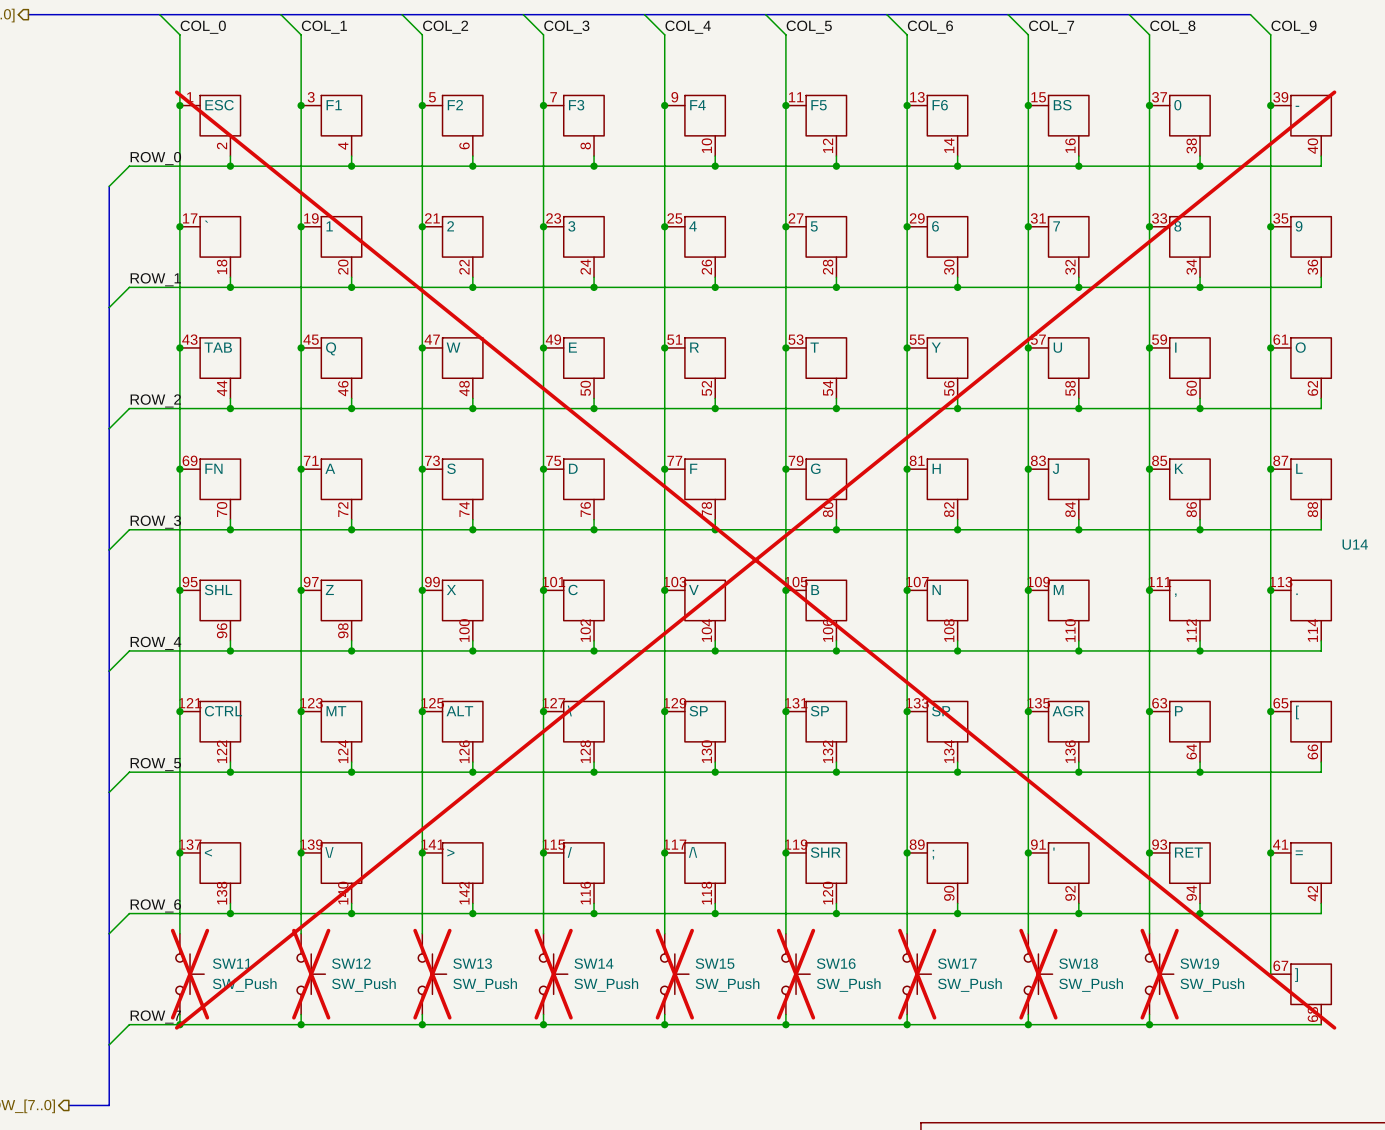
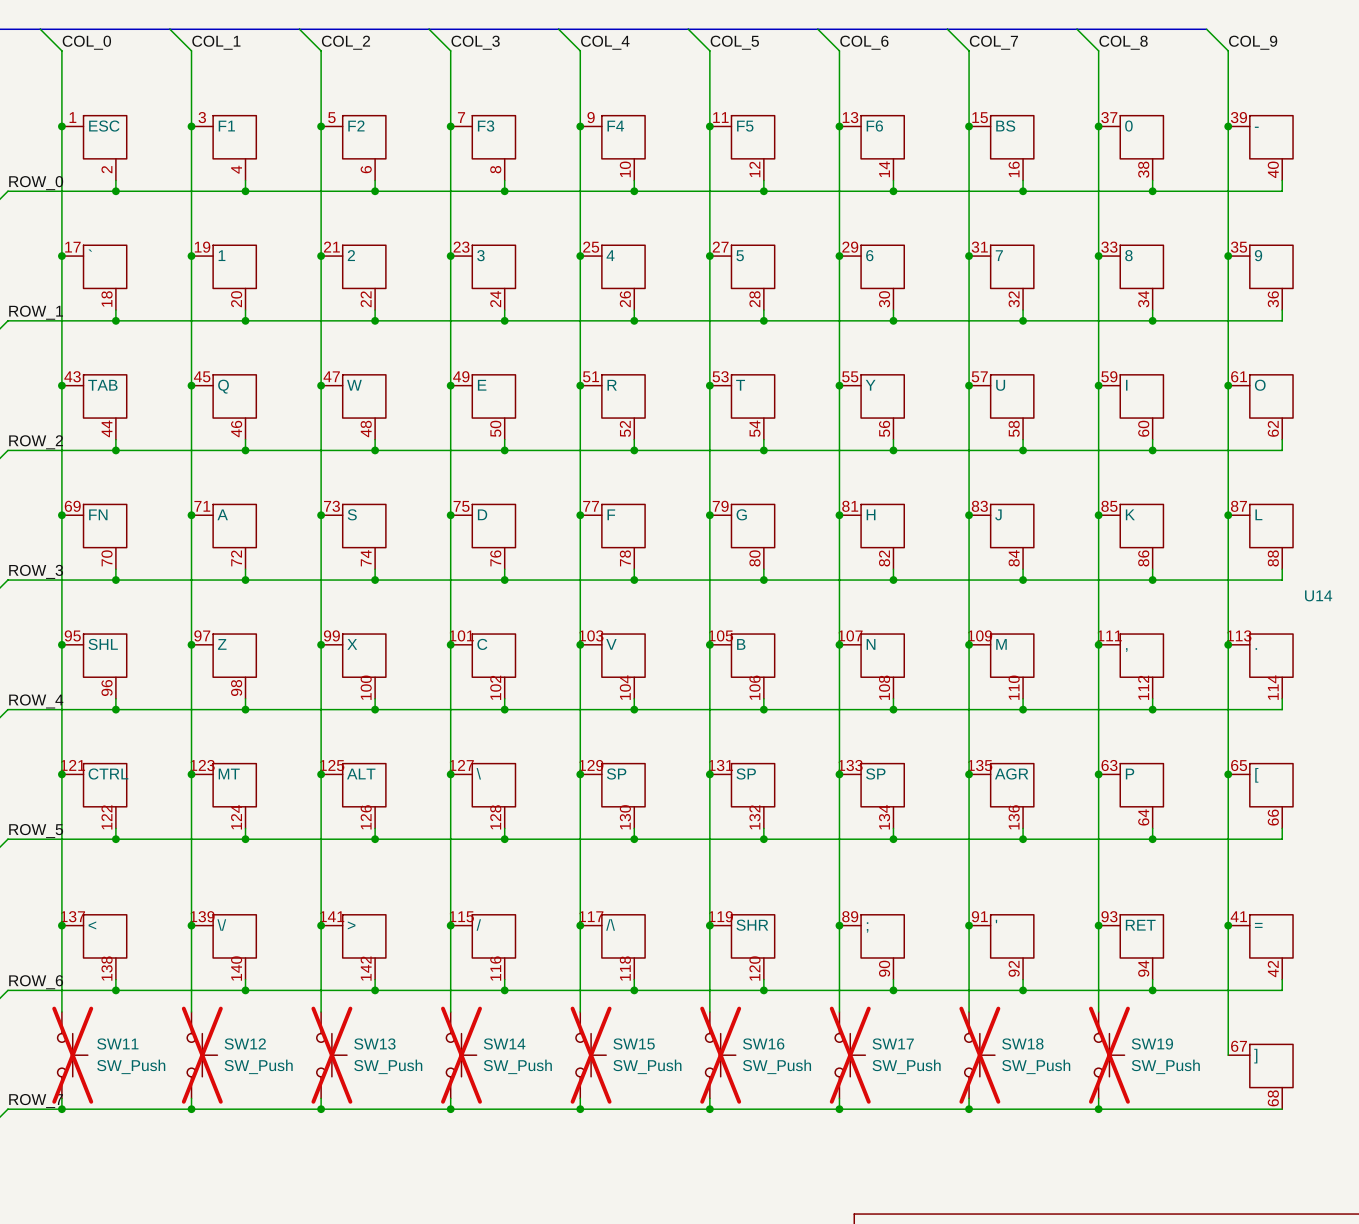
U14 do-not-place cross: (755, 560) -> none

